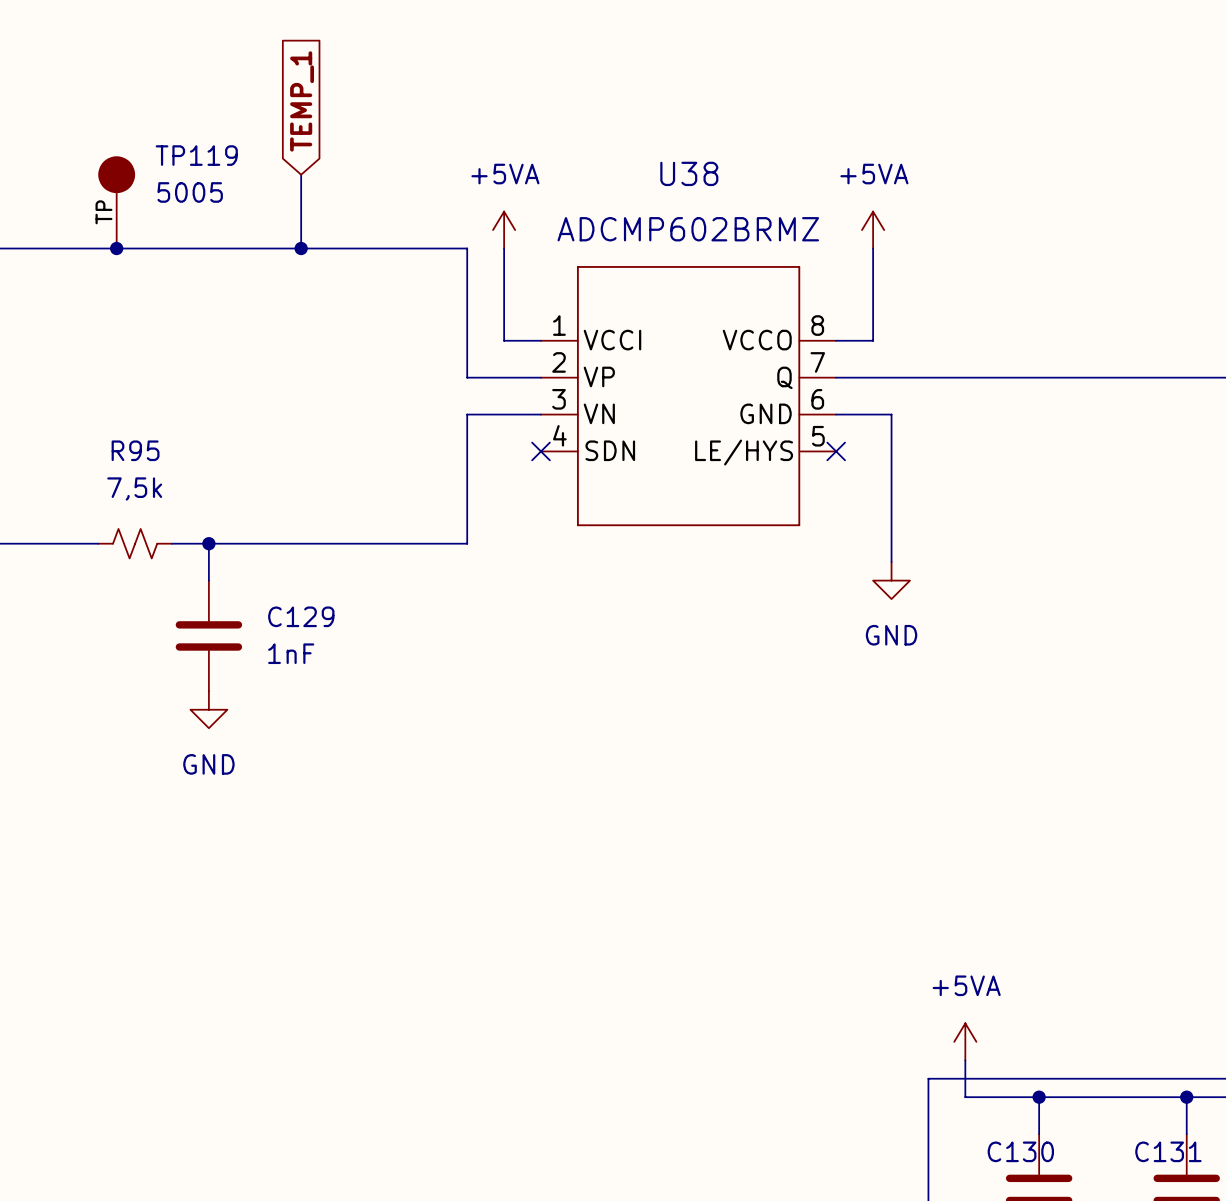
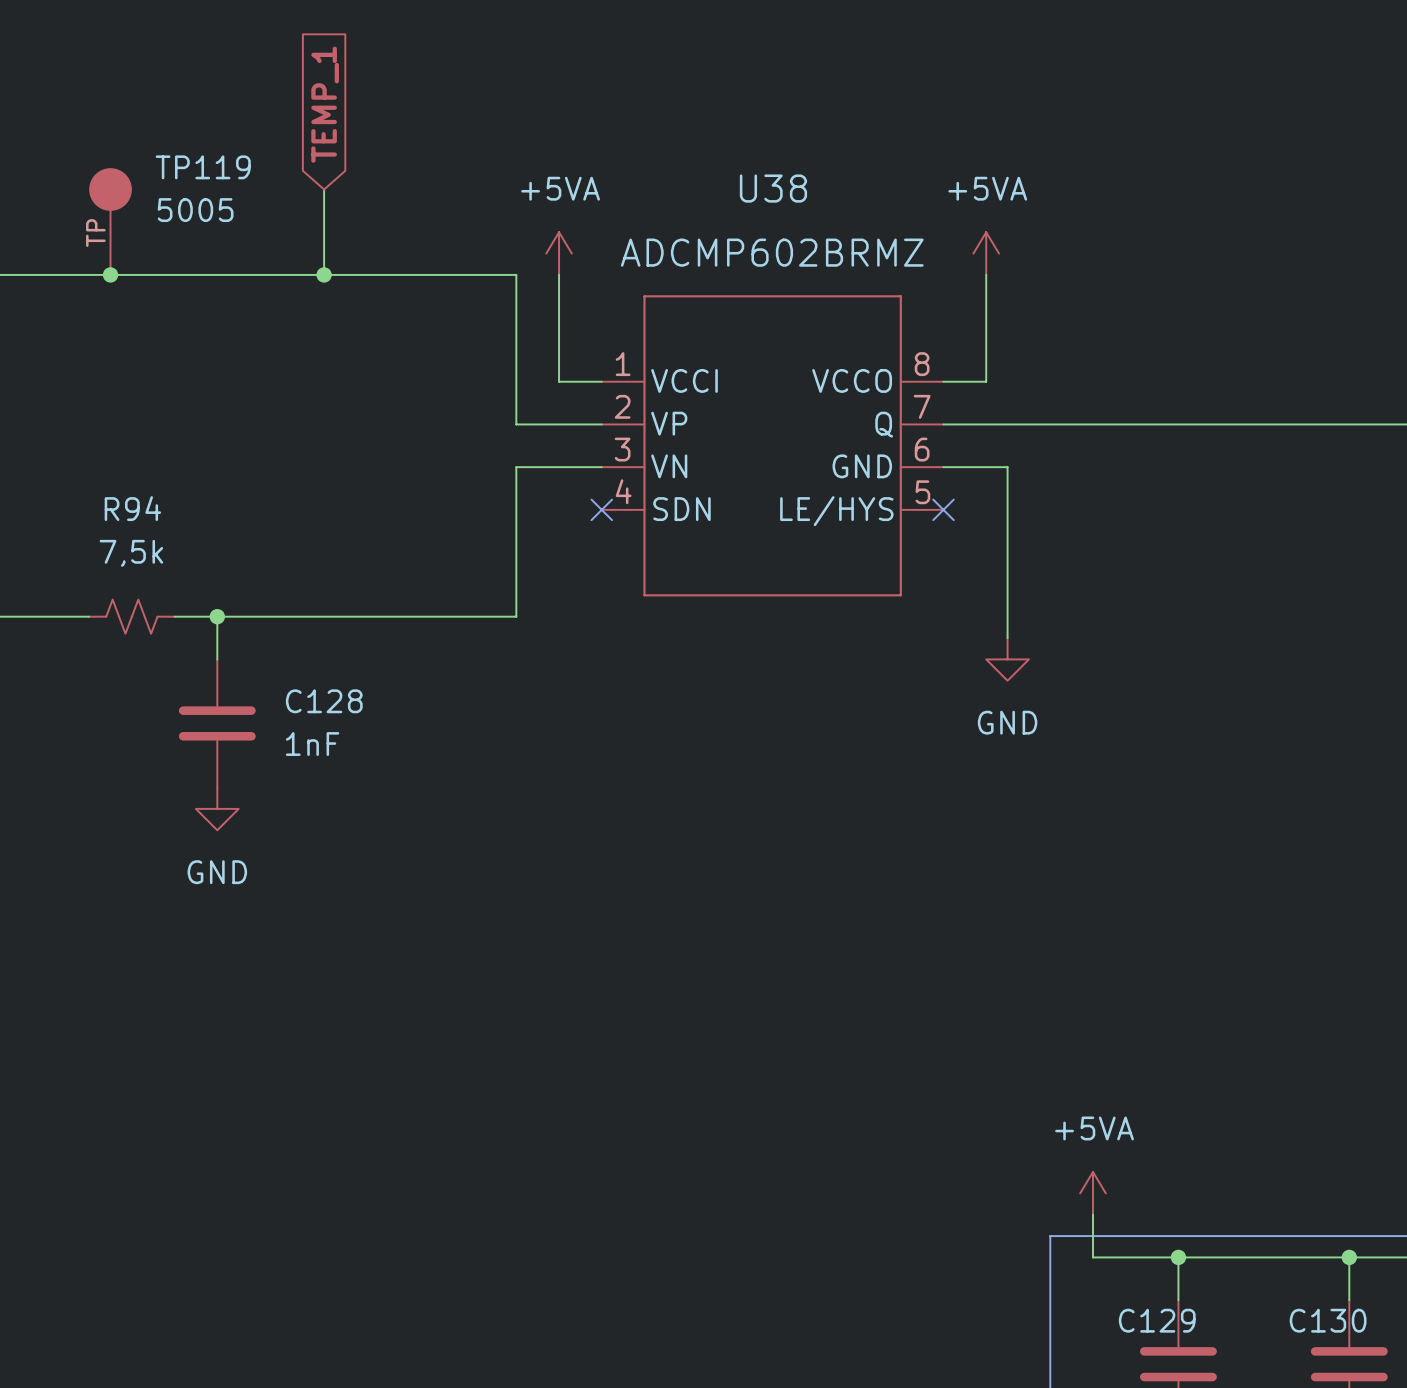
R95 name: R95 (135, 450) -> R94 (132, 508)
C129 name: C129 (301, 616) -> C128 (324, 701)
C130 name: C130 (1020, 1151) -> C129 (1157, 1320)
C131 name: C131 (1168, 1151) -> C130 (1328, 1320)

